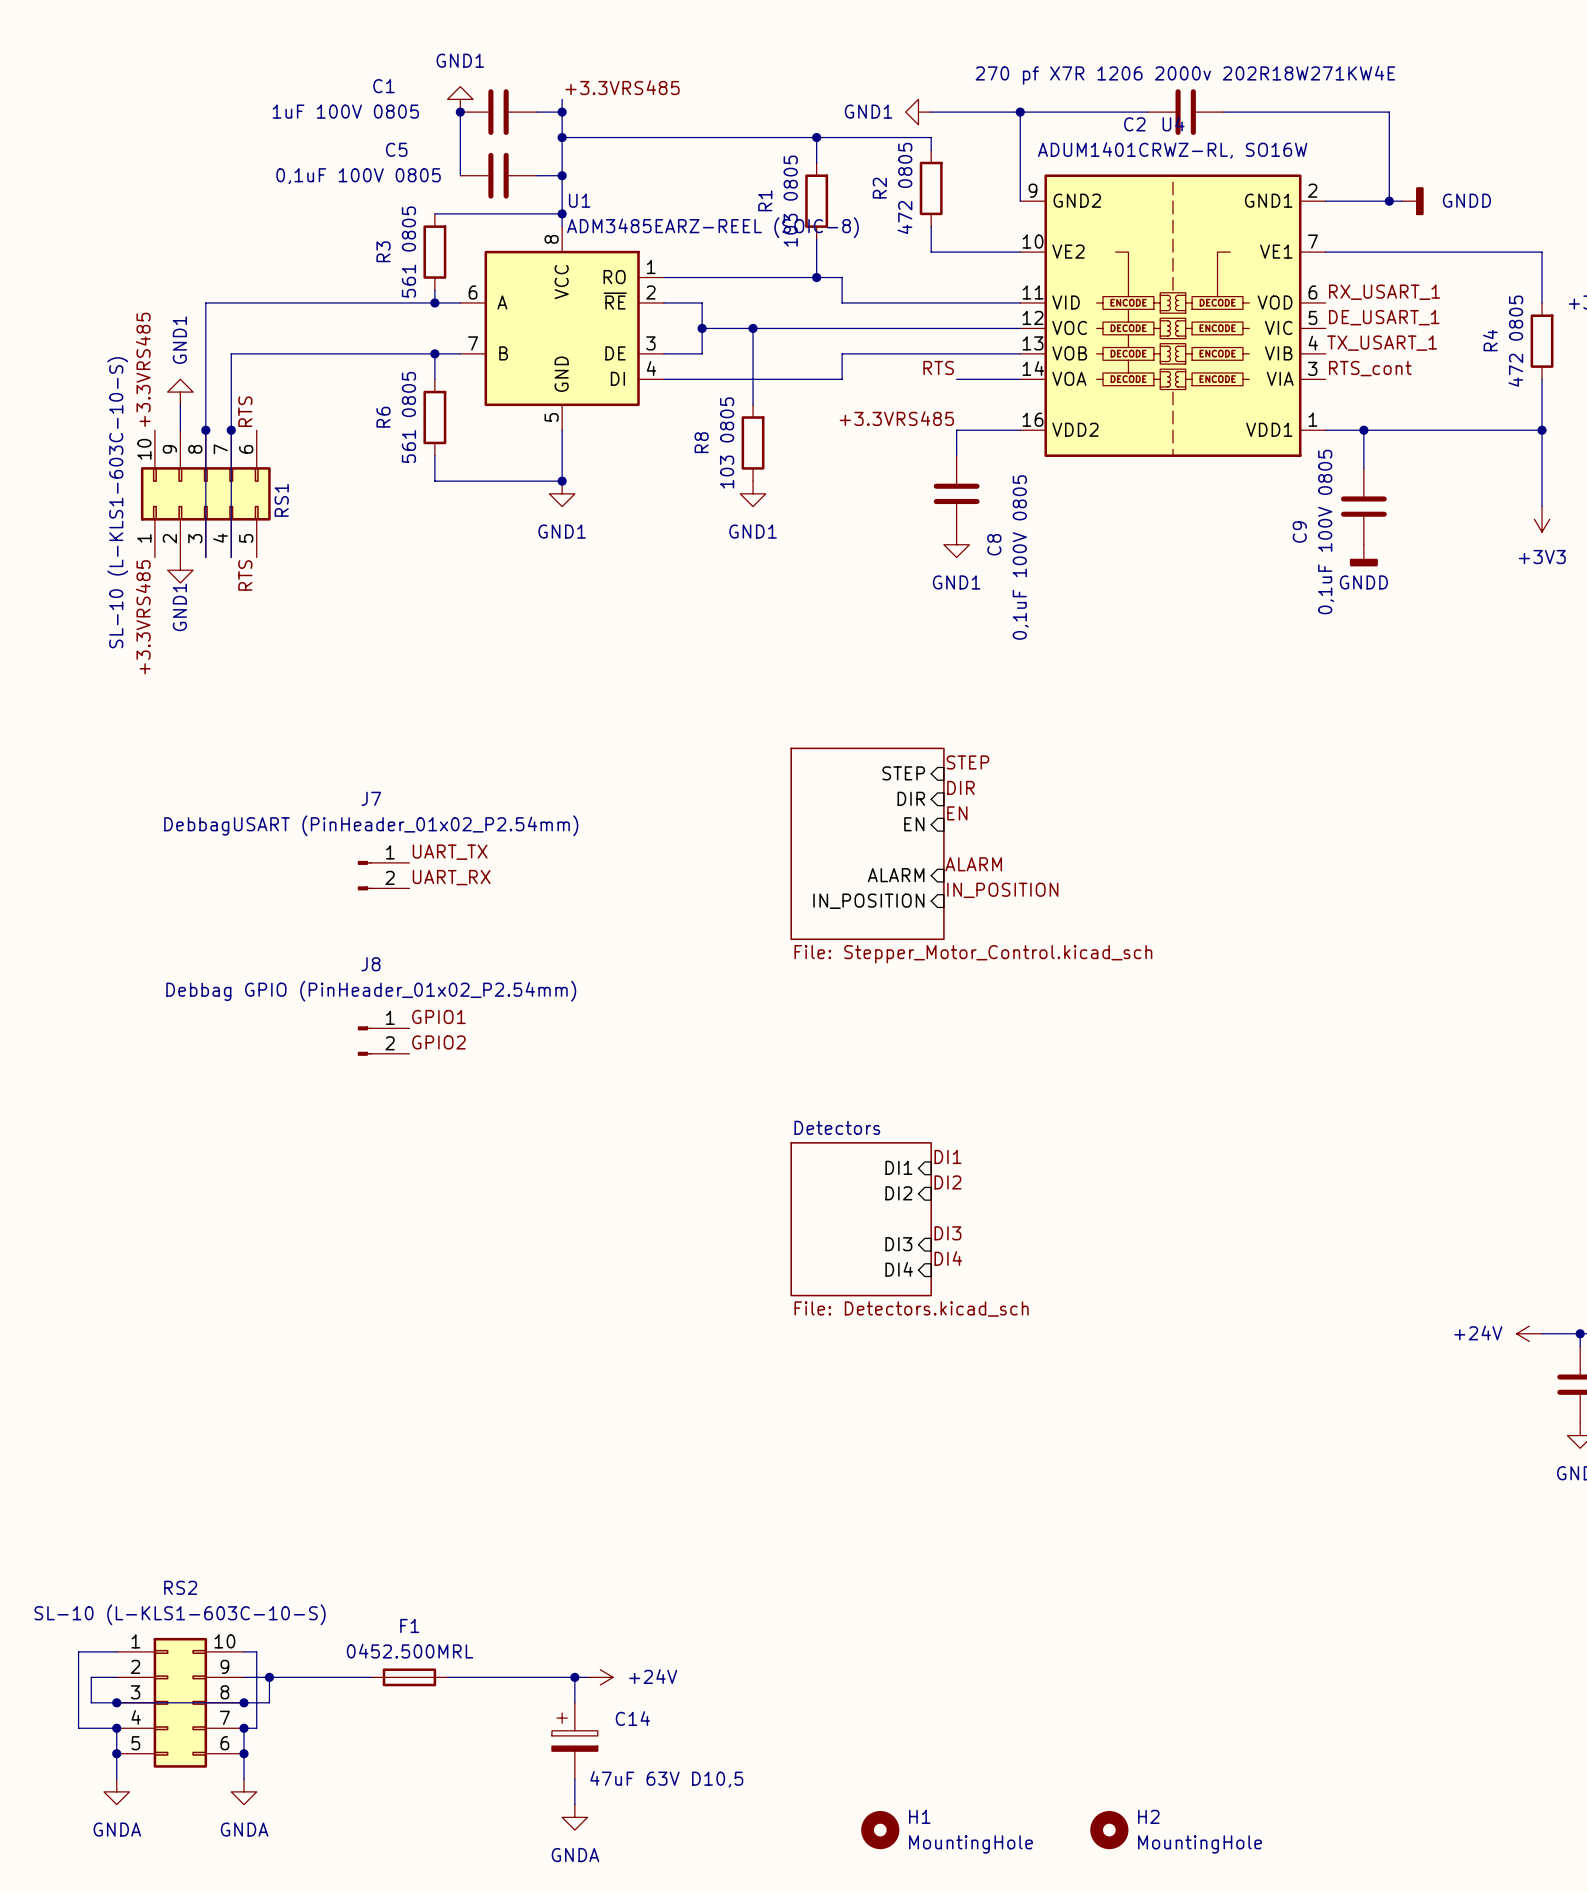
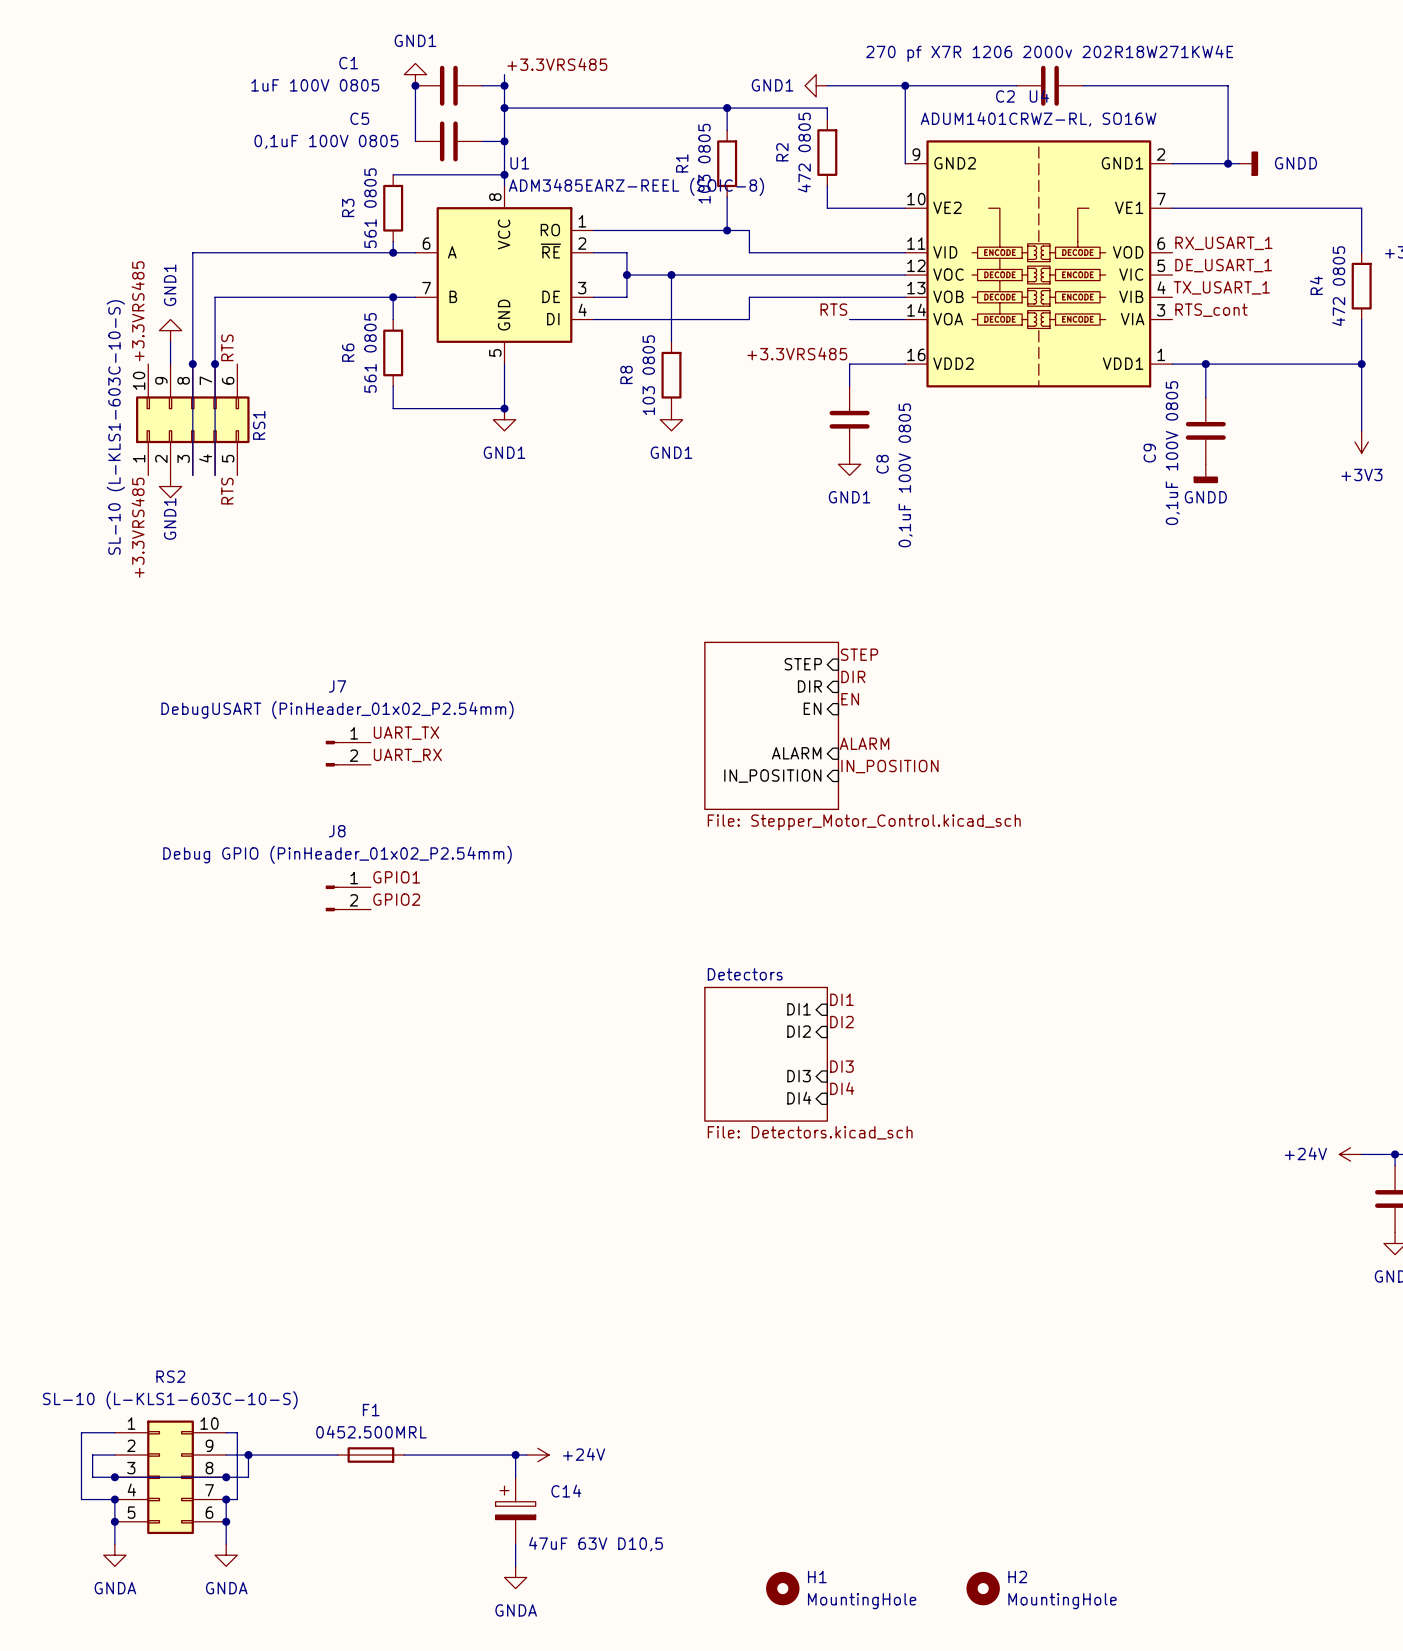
J7 value: DebbagUSART (PinHeader_01x02_P2.54mm) (371, 825) -> DebugUSART (PinHeader_01x02_P2.54mm) (337, 710)
J8 value: Debbag GPIO (PinHeader_01x02_P2.54mm) (371, 991) -> Debug GPIO (PinHeader_01x02_P2.54mm) (337, 854)

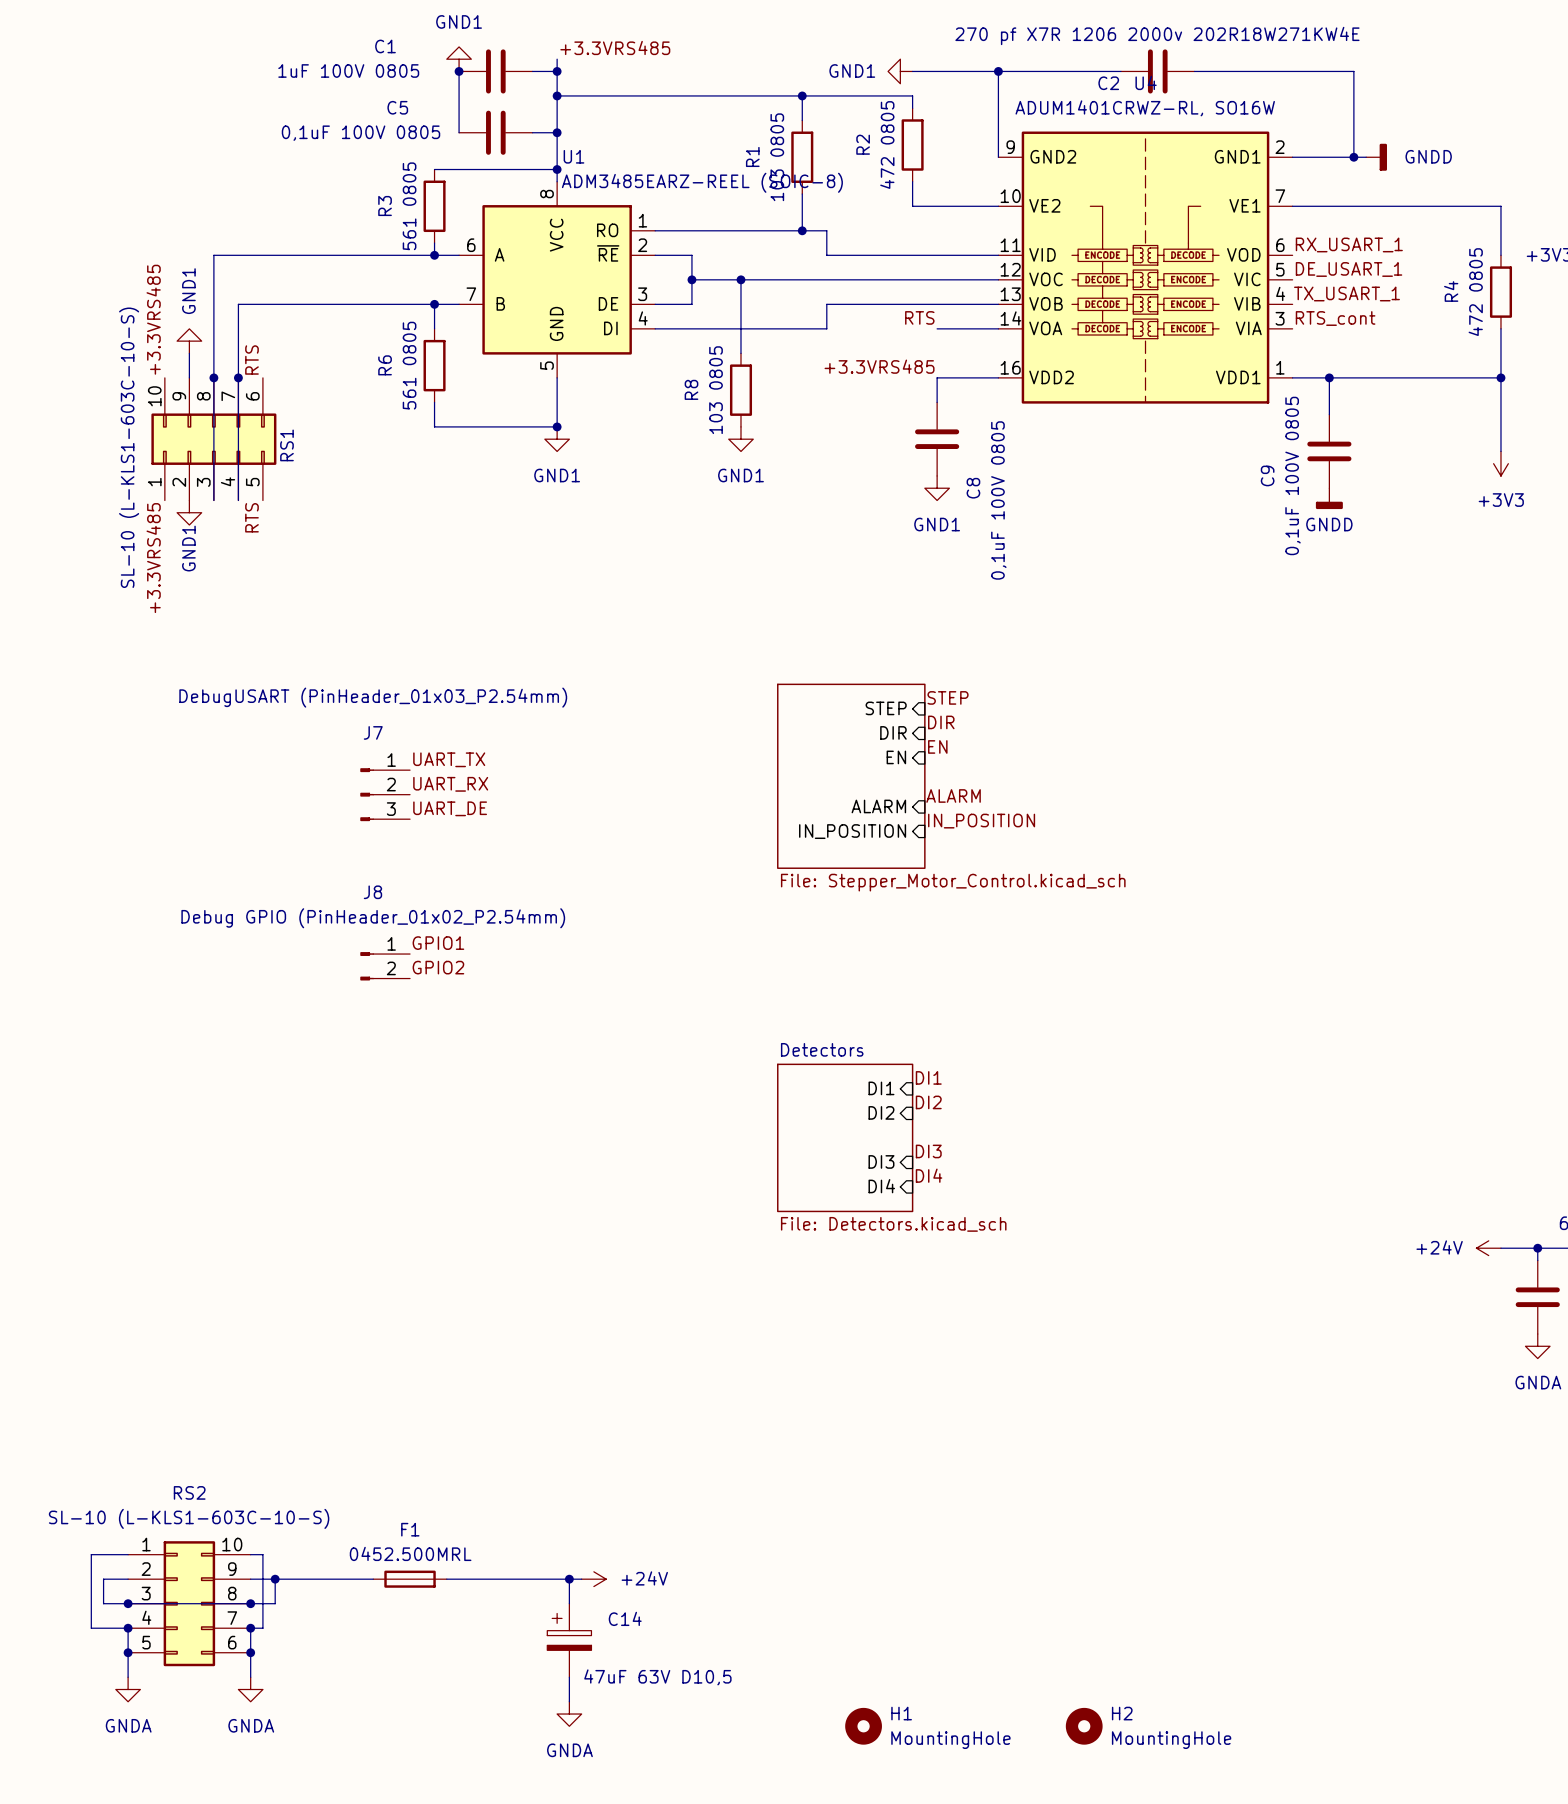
J7 value: DebugUSART (PinHeader_01x02_P2.54mm) (337, 710) -> DebugUSART (PinHeader_01x03_P2.54mm) (373, 697)
label: none -> UART_TX (449, 759)
label: UART_TX (406, 733) -> UART_RX (450, 784)
J7 symbol: [325, 740, 371, 767] -> [360, 768, 411, 822]
label: UART_RX (407, 755) -> UART_DE (450, 808)

